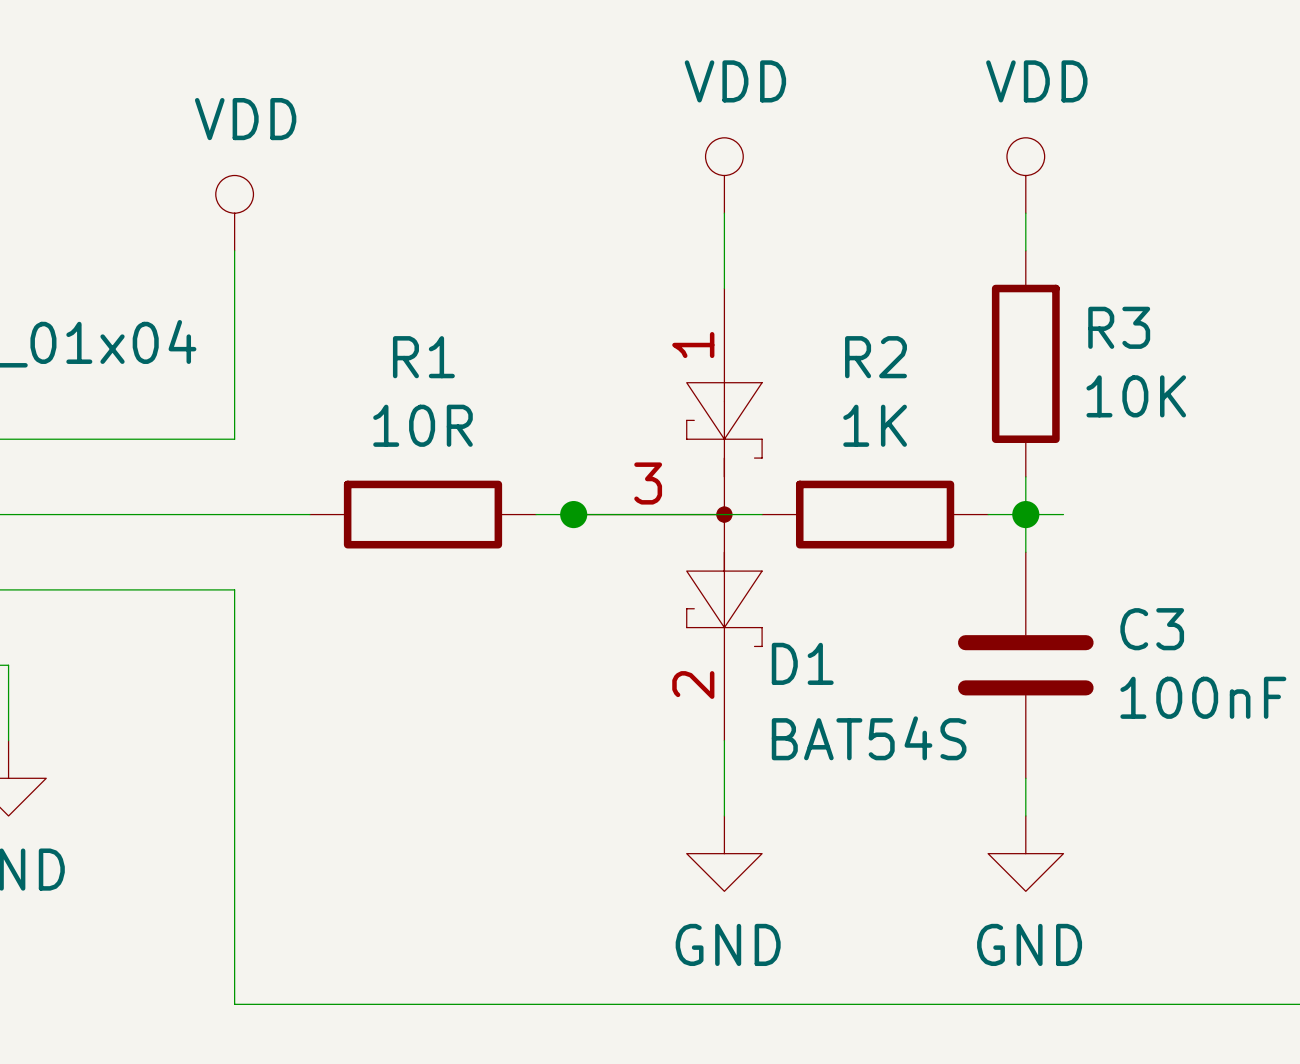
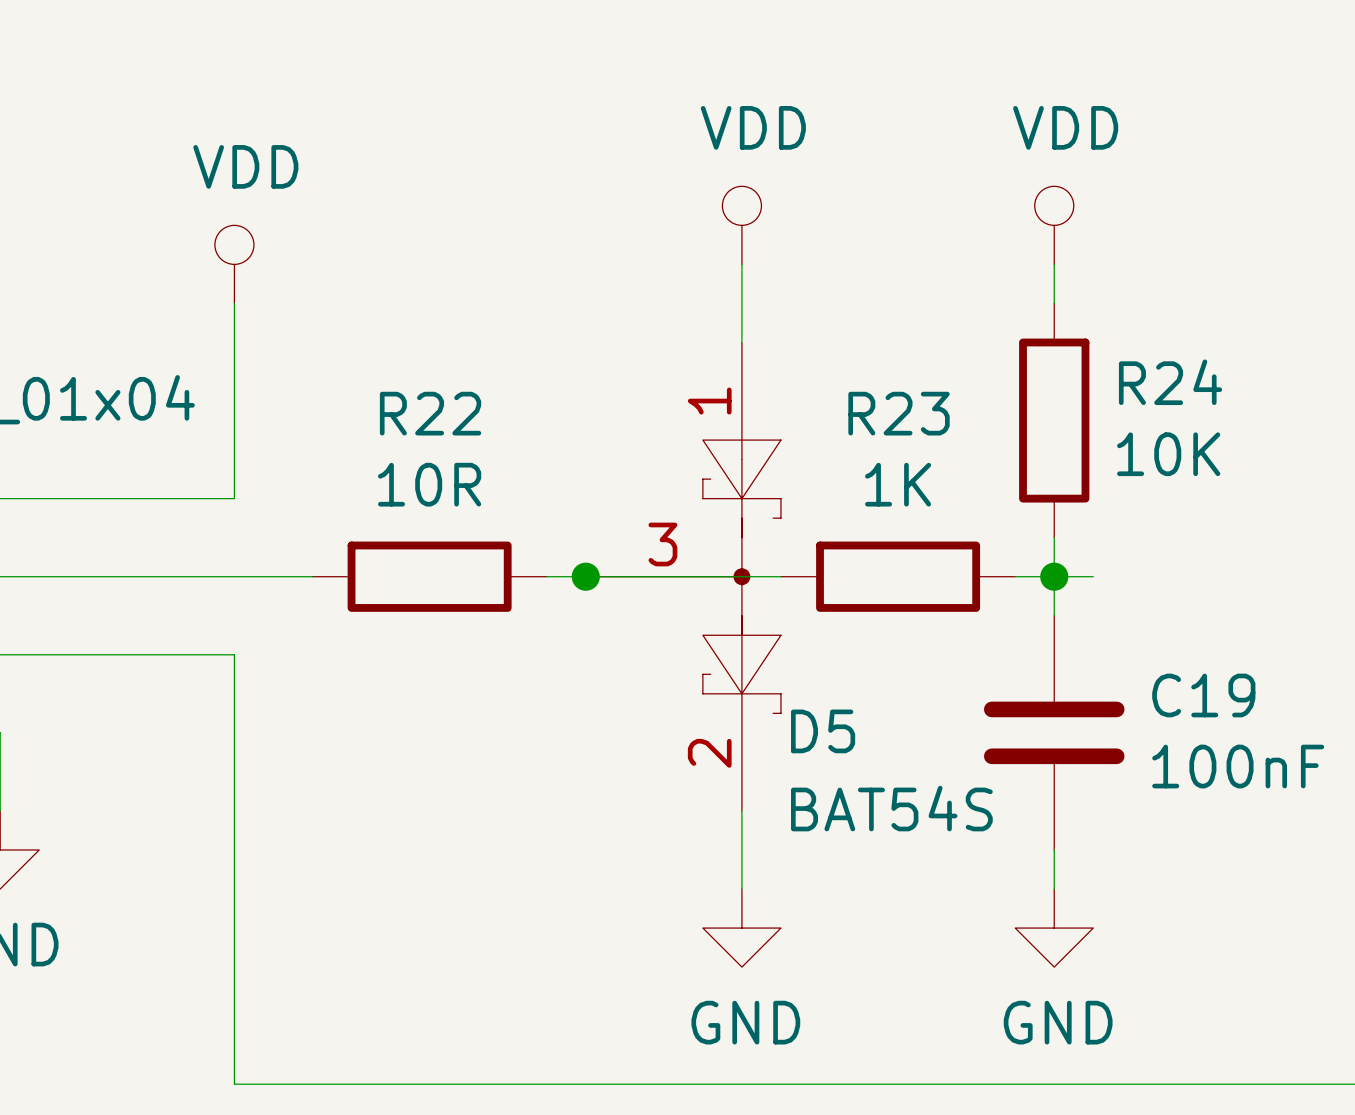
R3 name: R3 (1119, 327) -> R24 (1170, 382)
R1 name: R1 (423, 357) -> R22 (430, 413)
R2 name: R2 (876, 357) -> R23 (899, 413)
C3 name: C3 (1152, 629) -> C19 (1203, 695)
D1 name: D1 (802, 663) -> D5 (823, 731)

